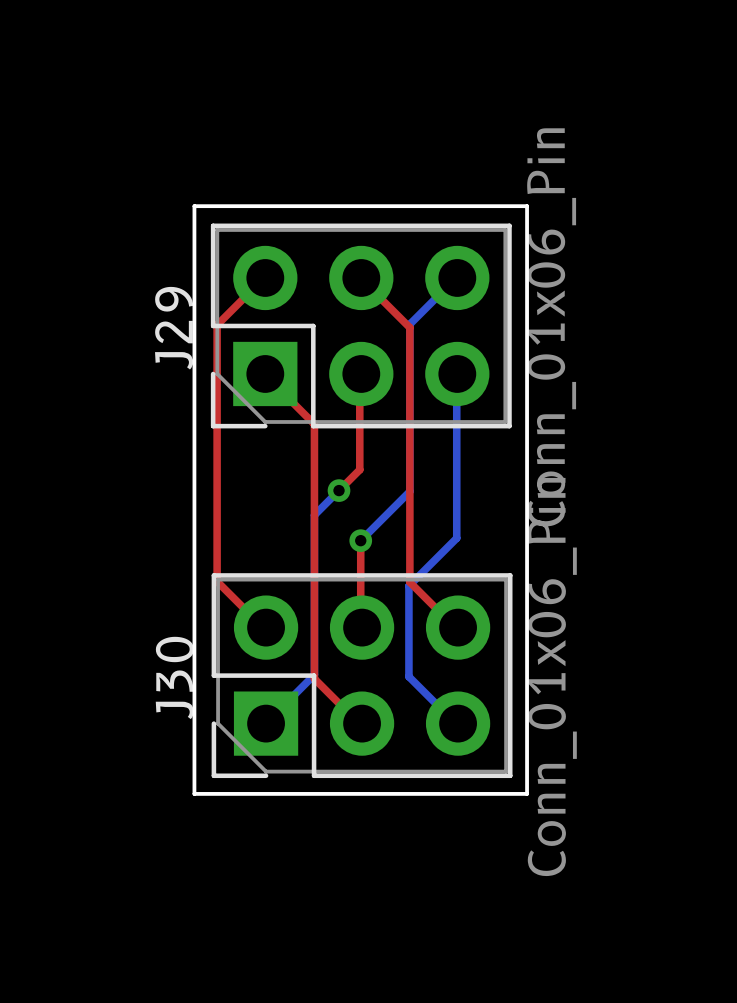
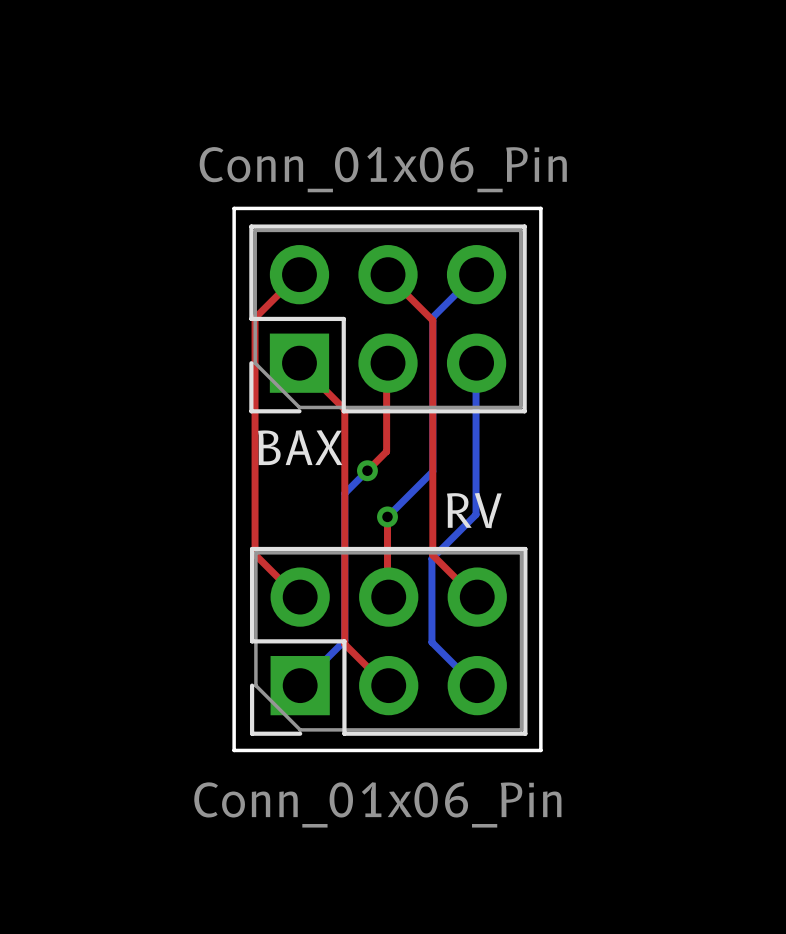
J29 value rotation: 0° (551, 327) -> 90° clockwise (383, 169)
J29 name: J29 (174, 328) -> BAX (300, 447)
J30 value rotation: 0° (552, 676) -> 90° clockwise (377, 804)
J30 name: J30 (174, 677) -> RV (474, 510)

